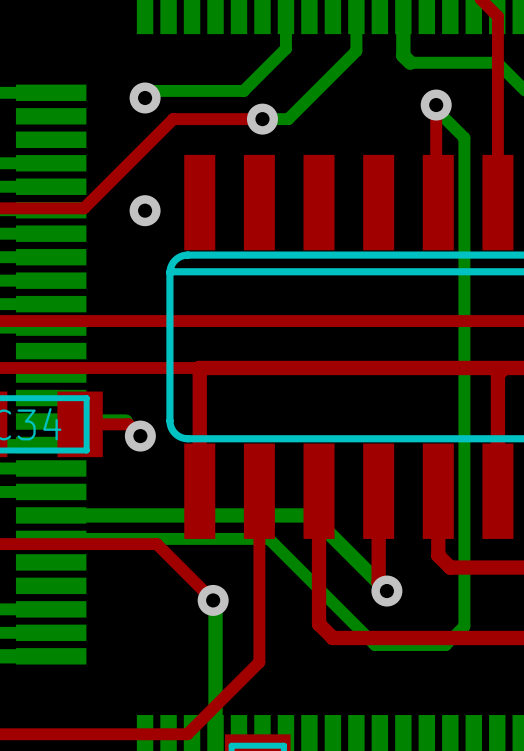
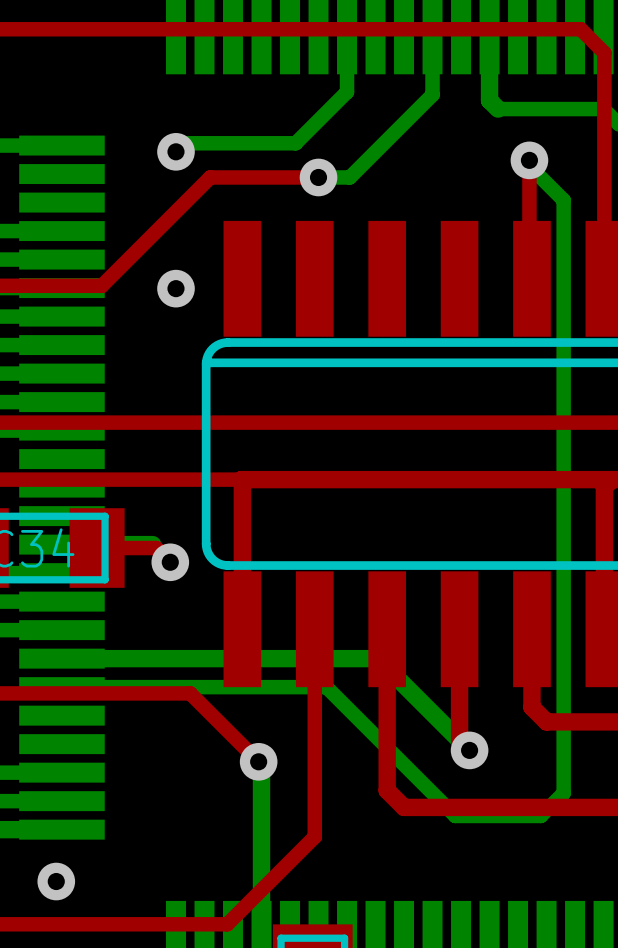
via: none -> (56, 881)

